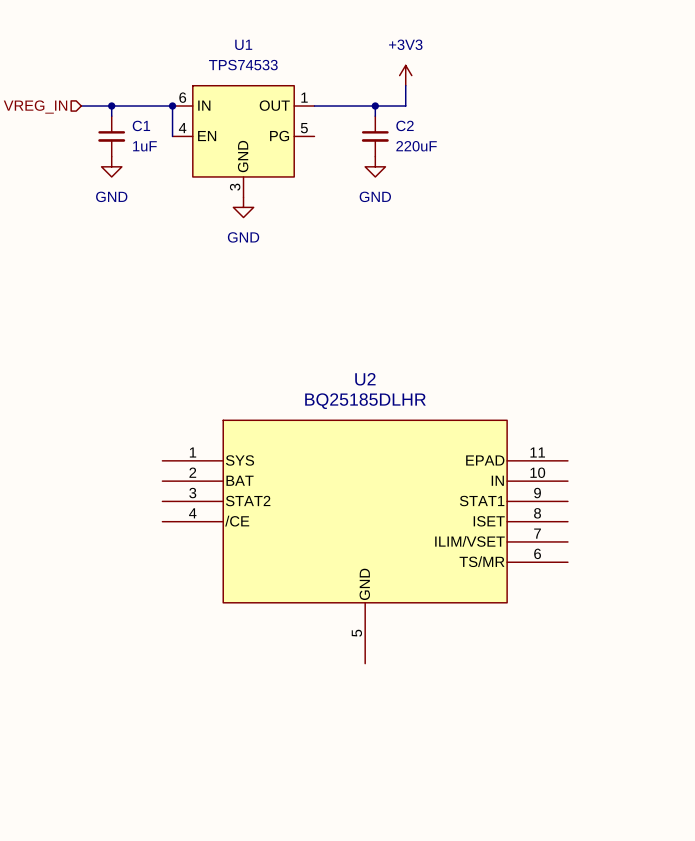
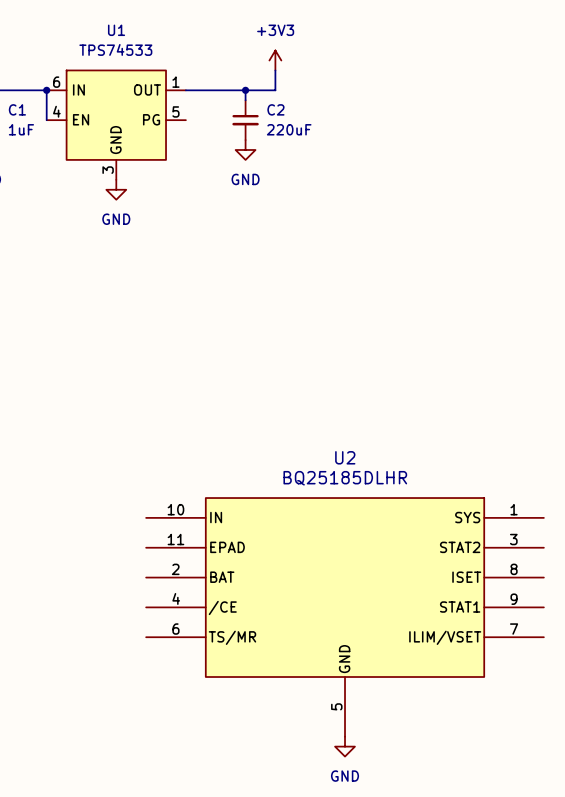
U2 symbol: [162, 420, 568, 664] -> [146, 498, 544, 737]
power symbol: none -> GND (345, 746)

